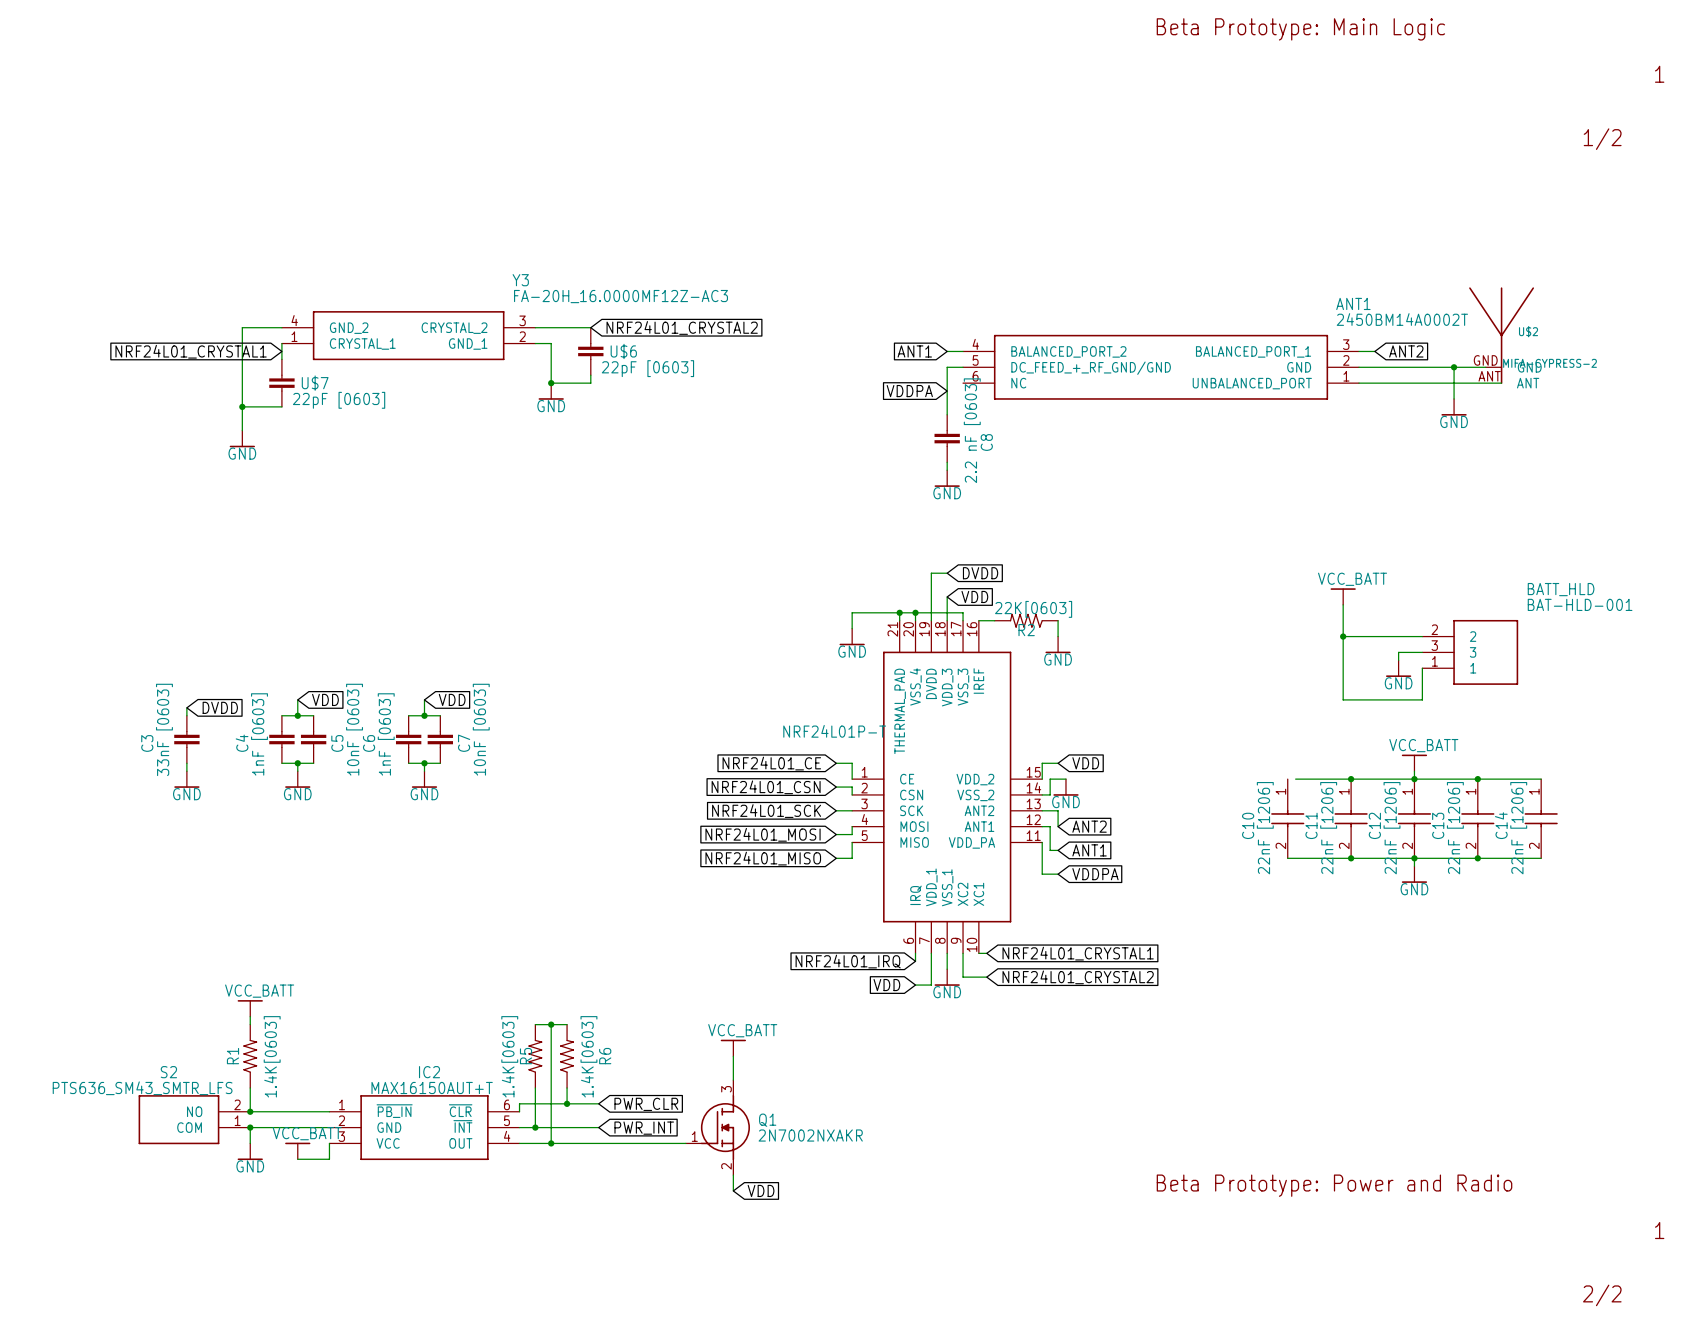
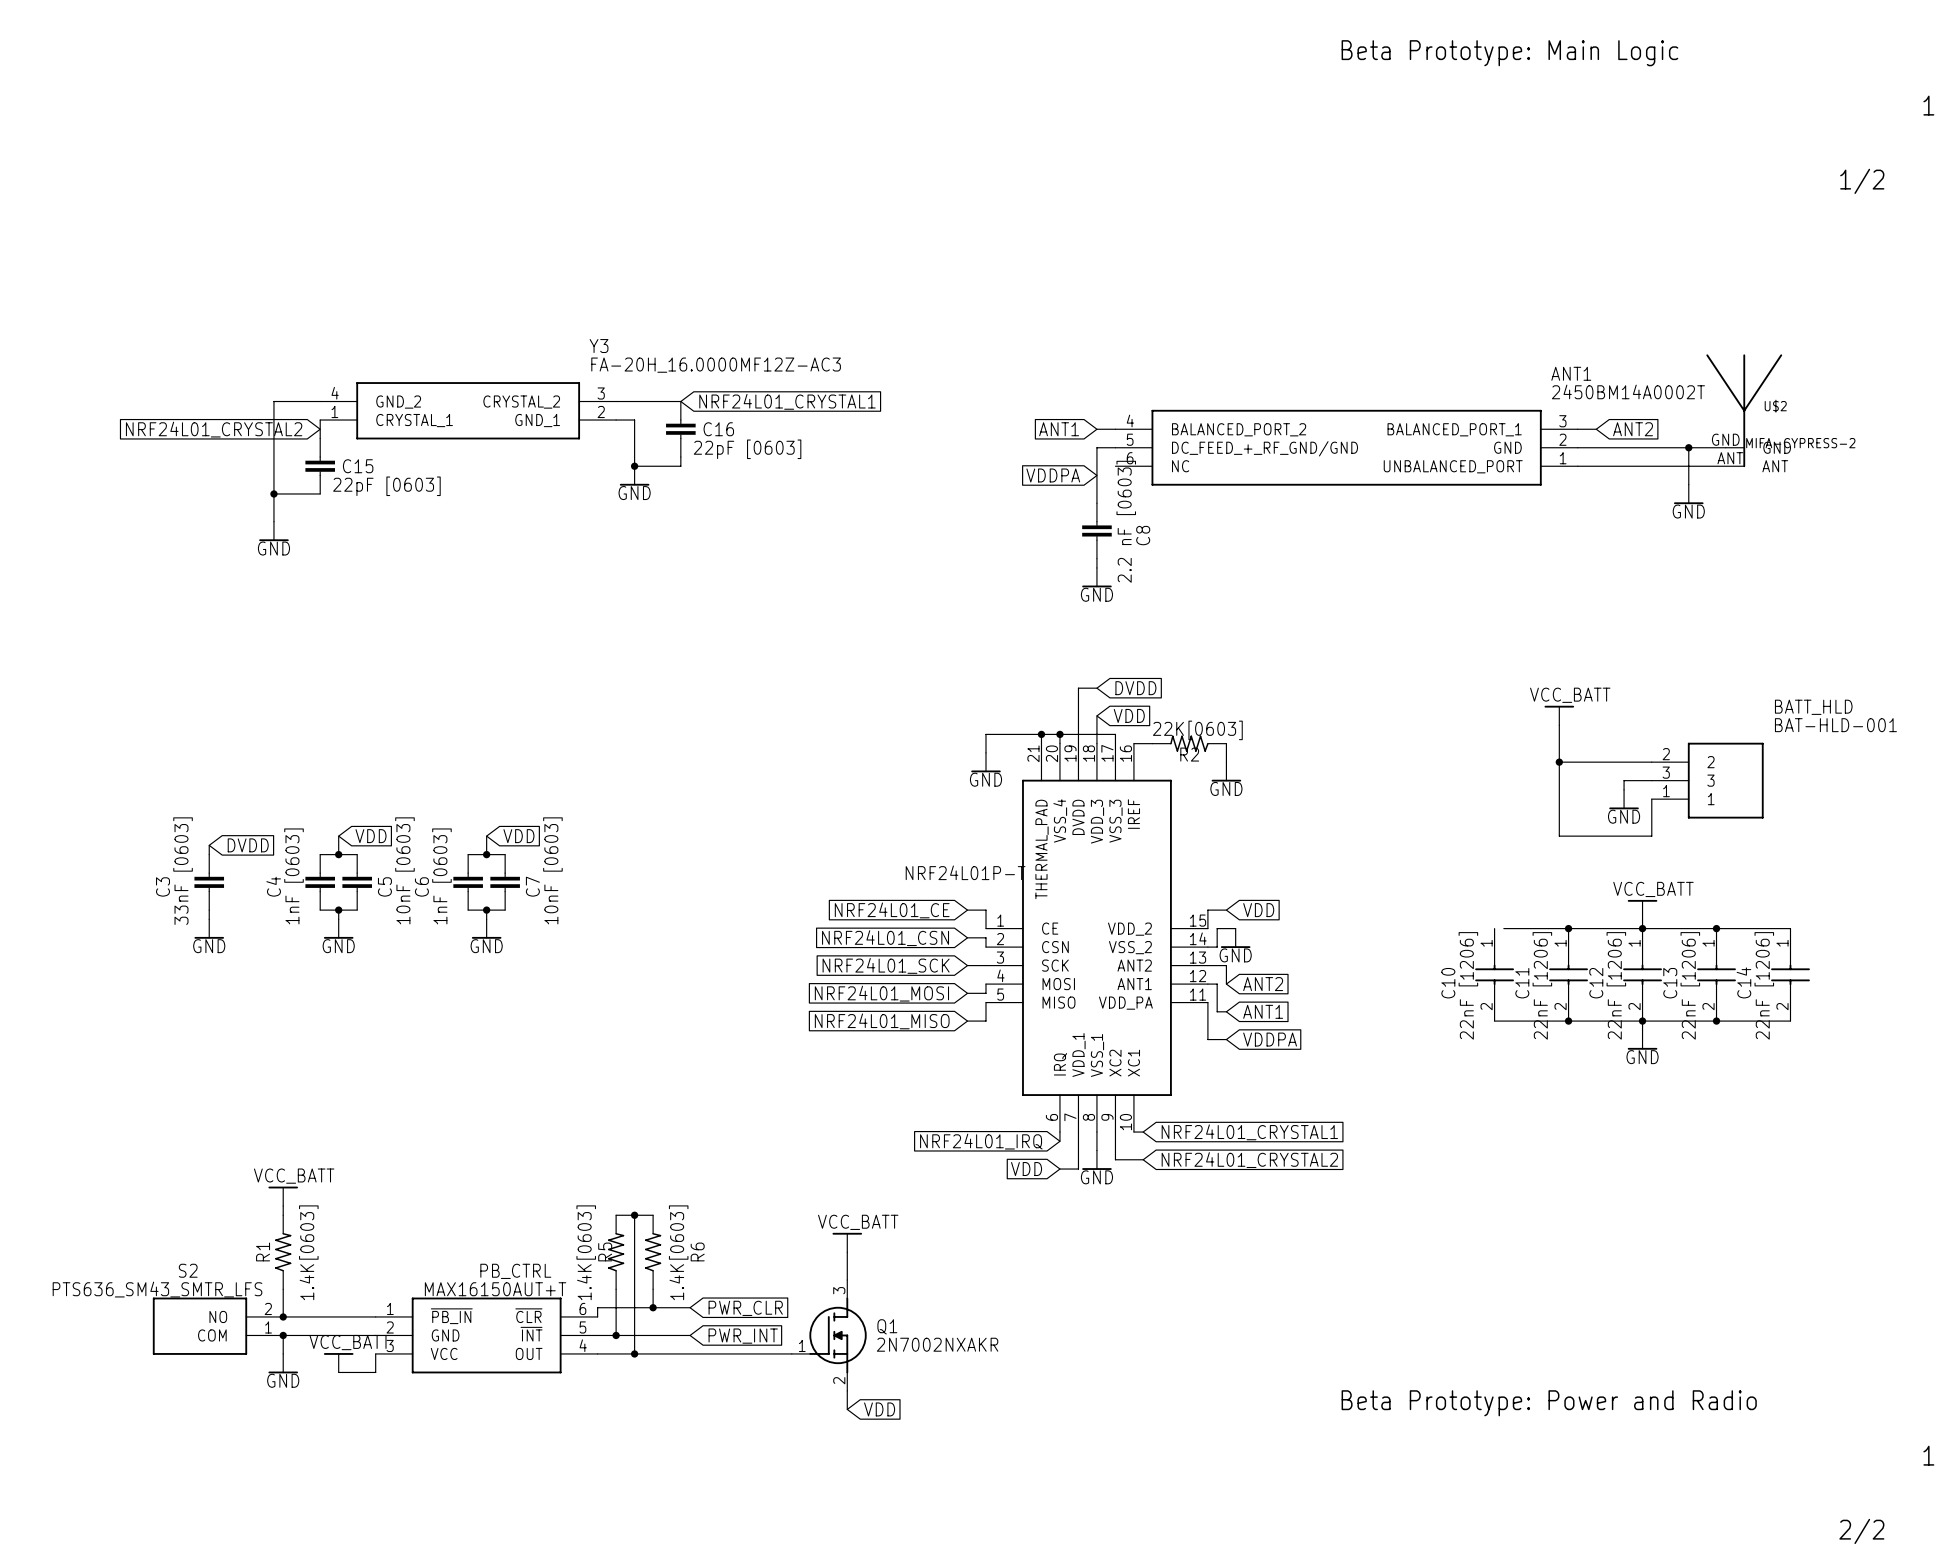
global label: NRF24L01_CRYSTAL2 (682, 327) -> NRF24L01_CRYSTAL1 (787, 401)
global label: NRF24L01_CRYSTAL1 (191, 351) -> NRF24L01_CRYSTAL2 (214, 429)
U$6 name: U$6 (623, 351) -> C16 (718, 429)
U$7 name: U$7 (315, 383) -> C15 (358, 466)
IC2 name: IC2 (429, 1072) -> PB_CTRL (515, 1271)

